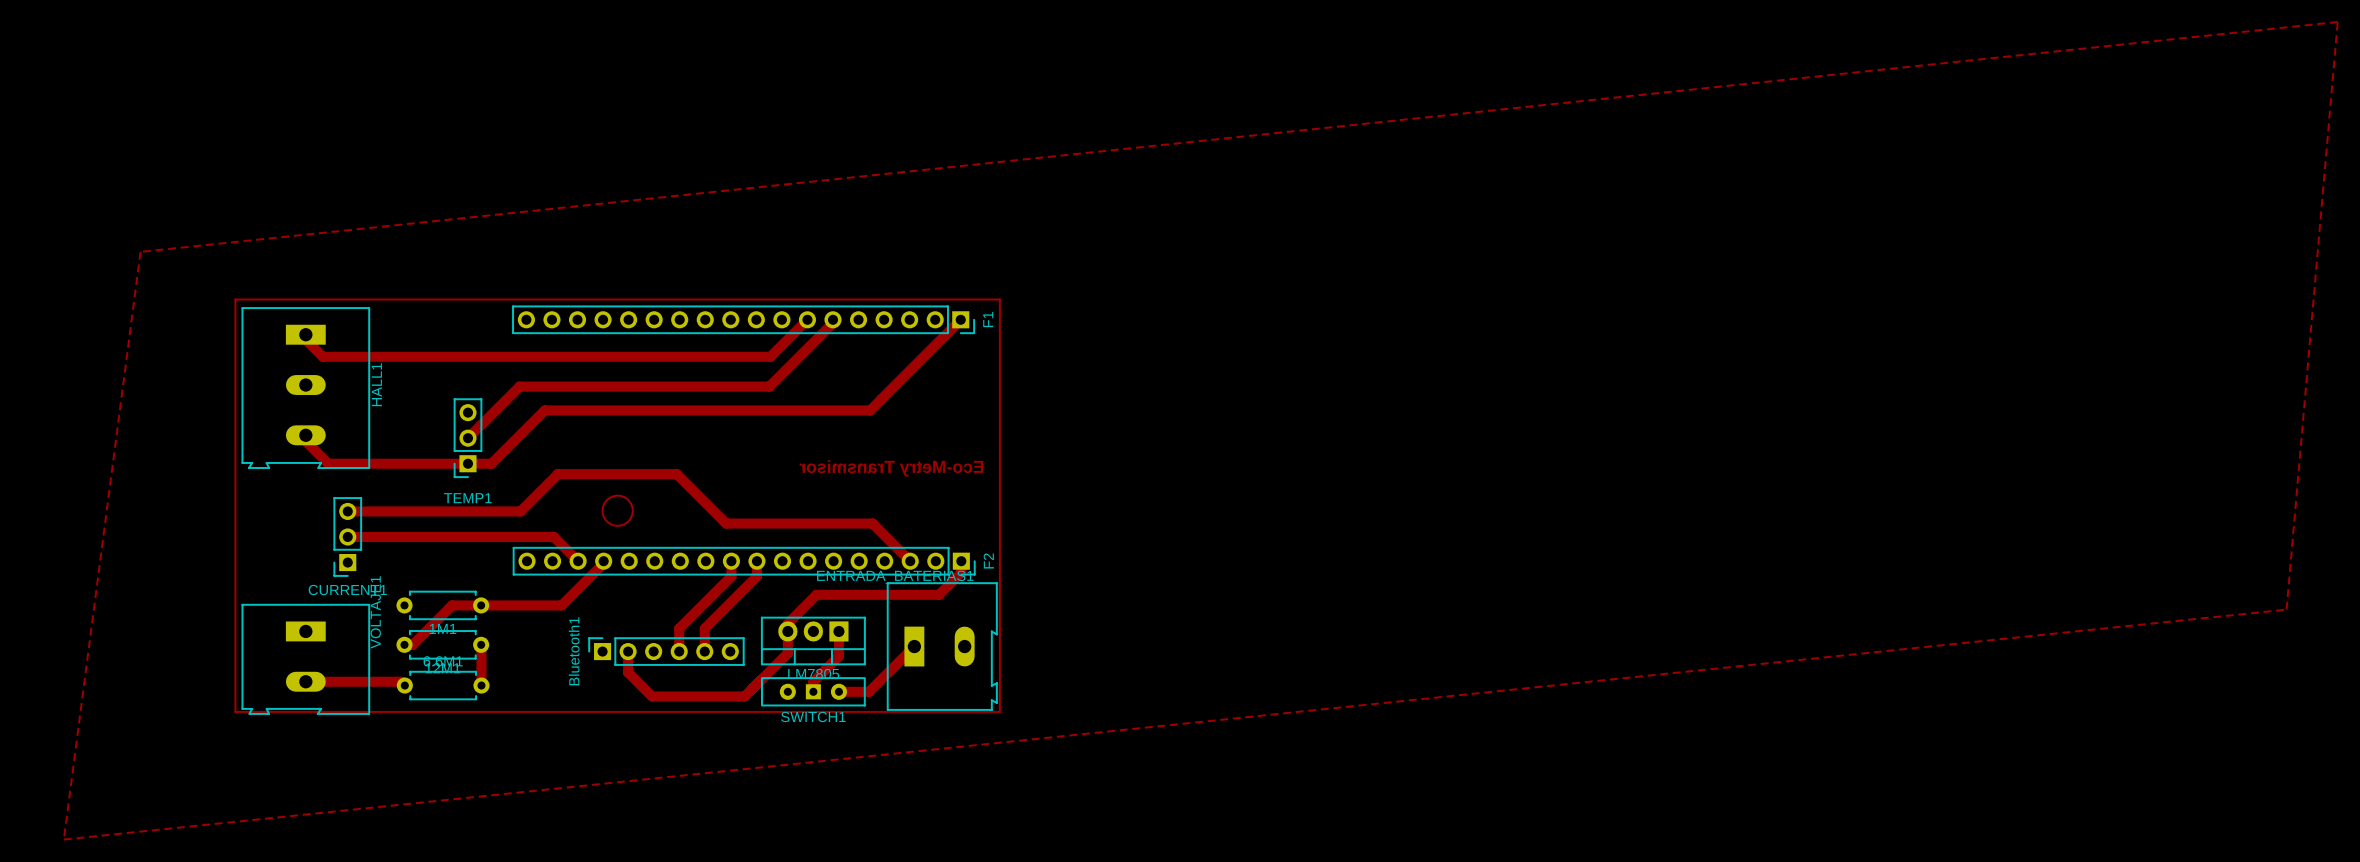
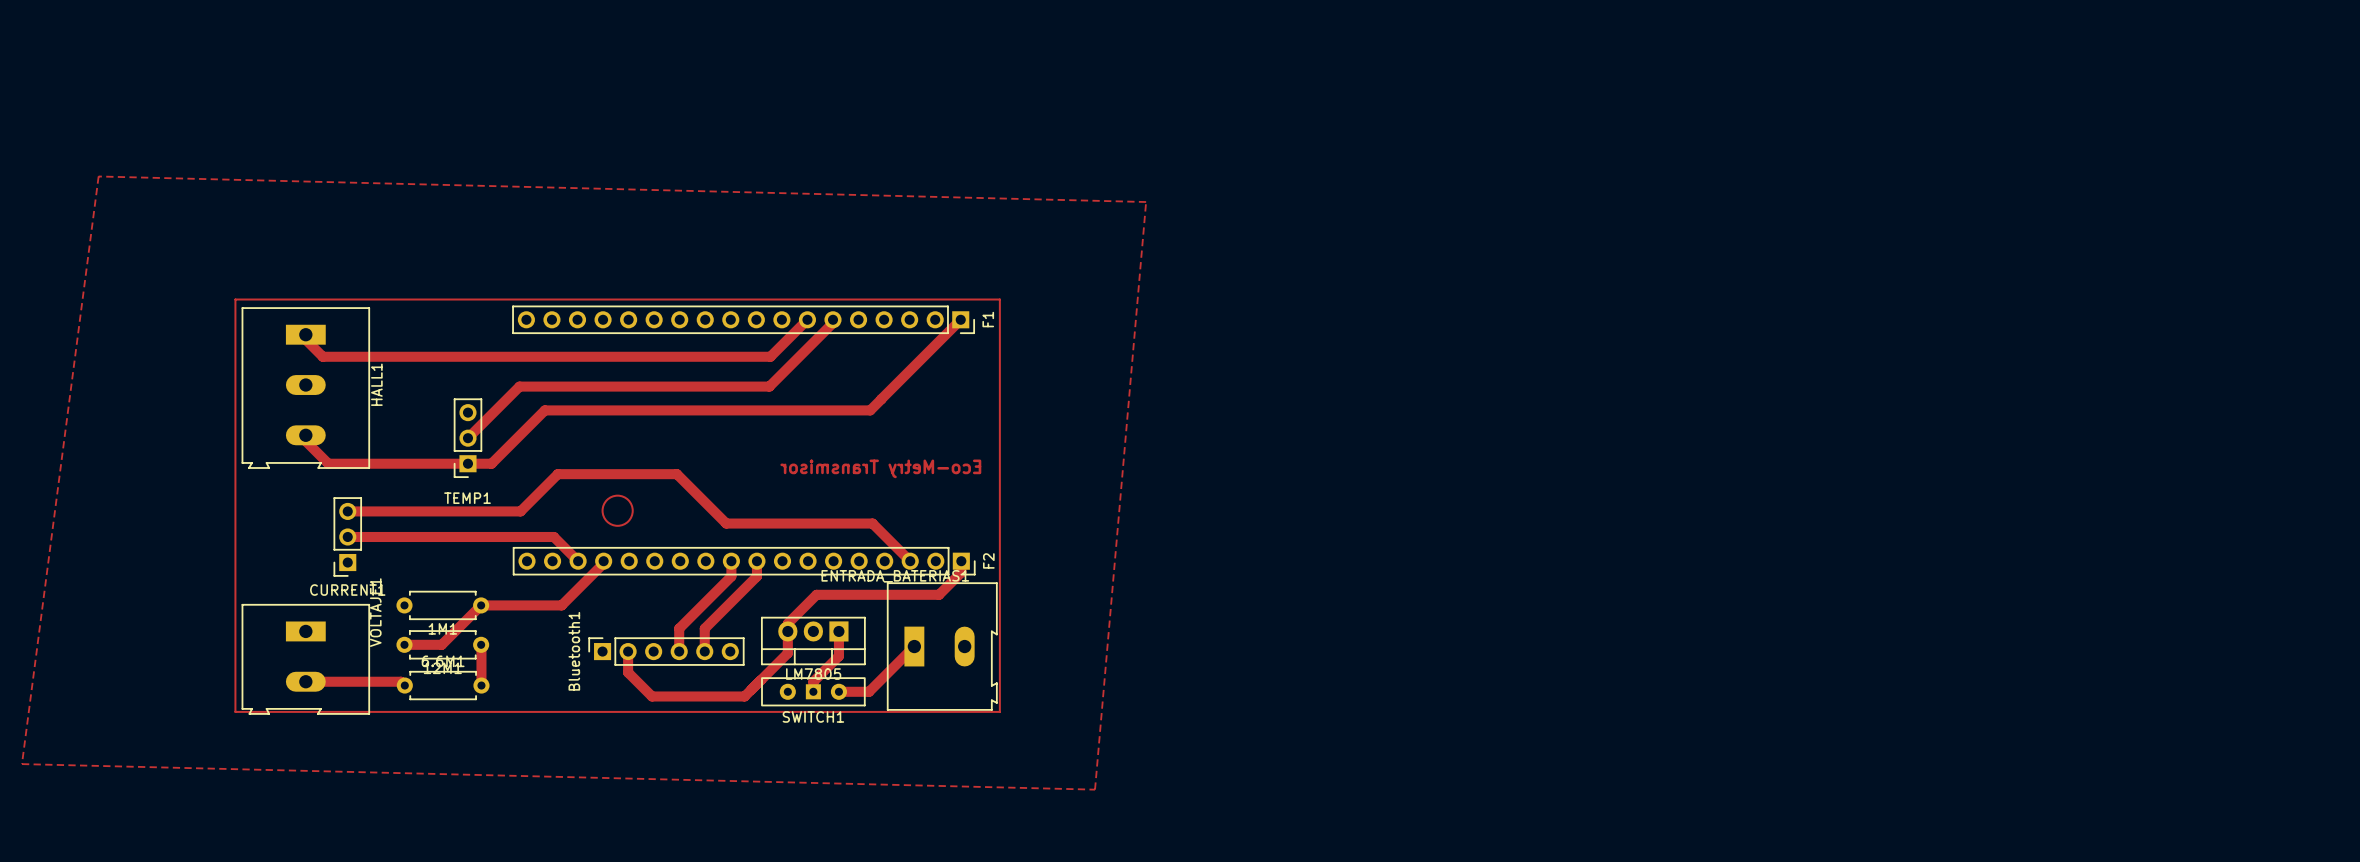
top zone outline: (2337, 21) (2286, 609) (63, 839) (140, 251) (2337, 21) -> none
top zone outline: none -> (98, 176) (21, 764) (1095, 789) (1146, 202) (98, 176)
top track: (481, 605) (452, 605) (412, 644) -> (481, 605) (441, 644) (412, 644)

